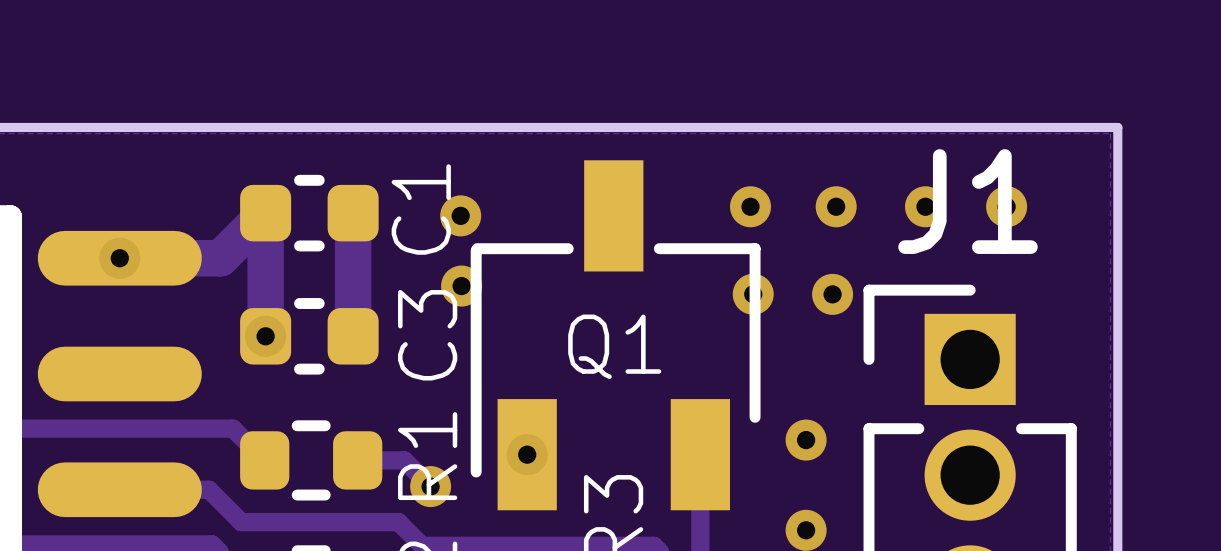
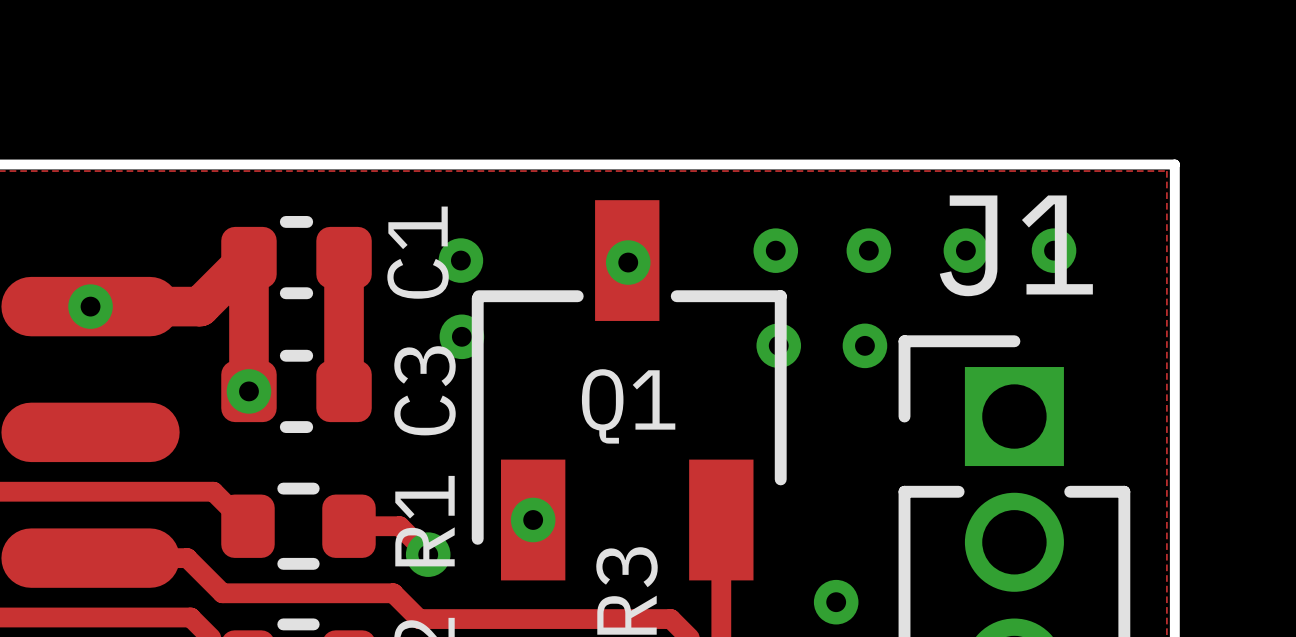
via position: (806, 440) -> (628, 262)

